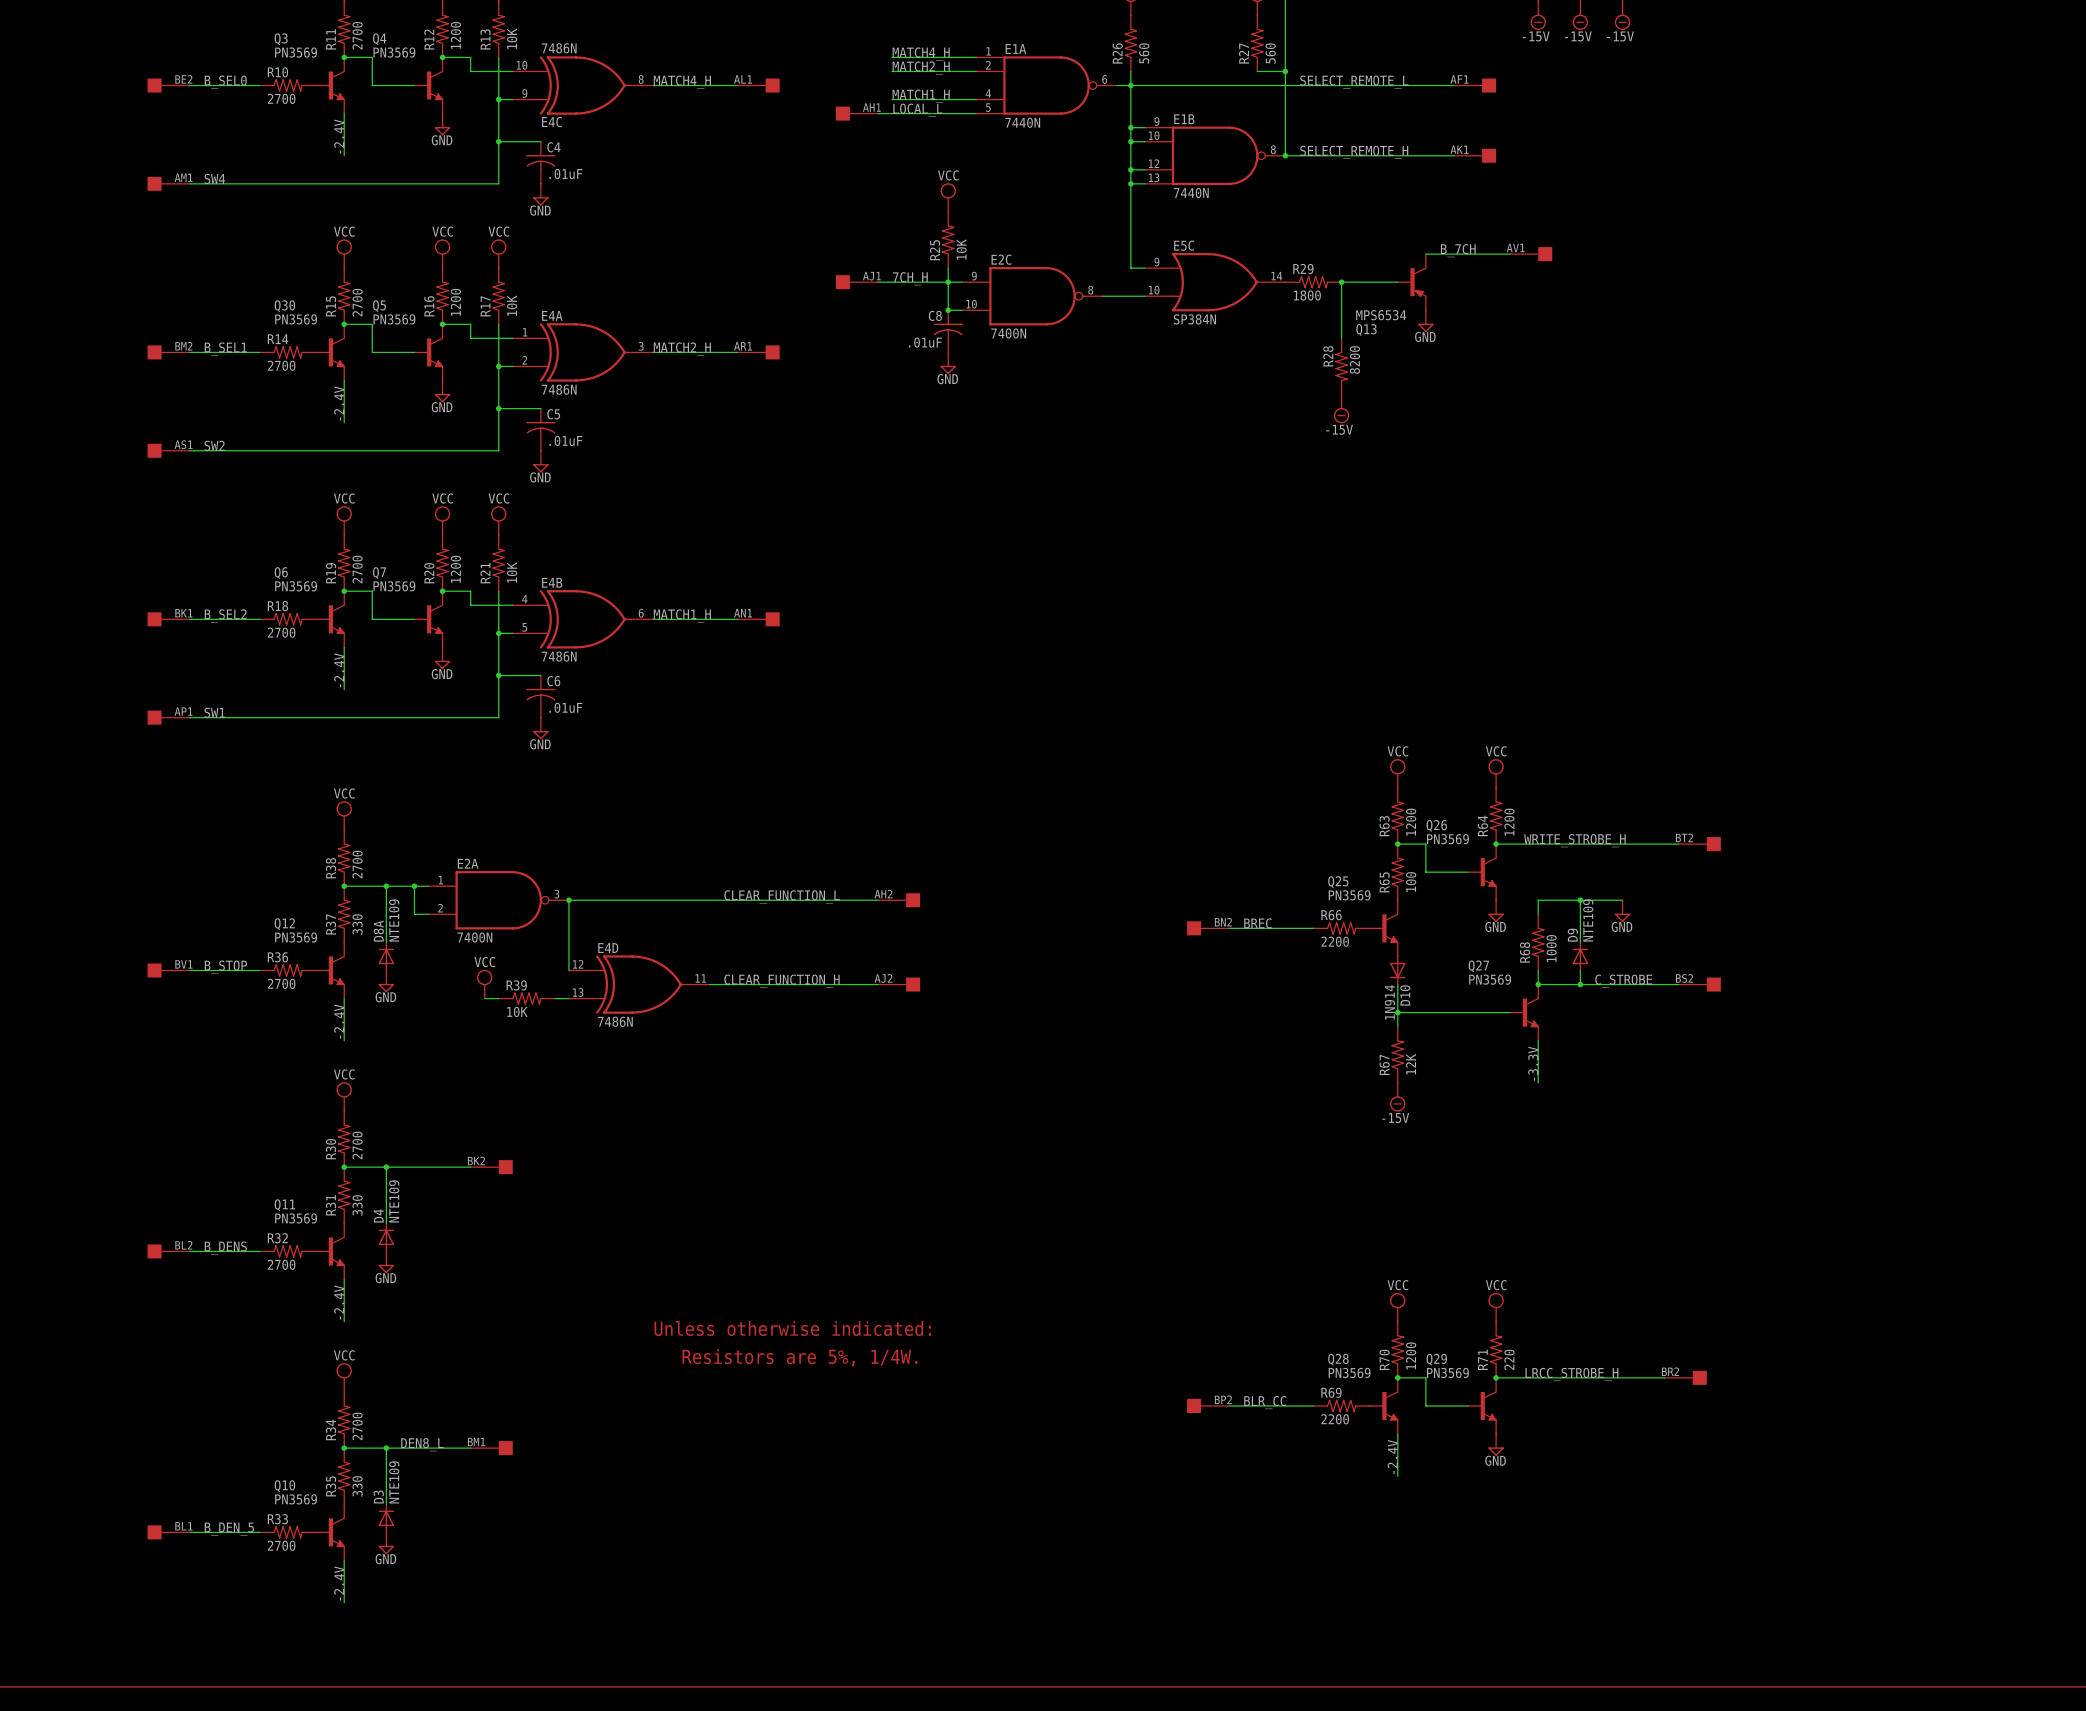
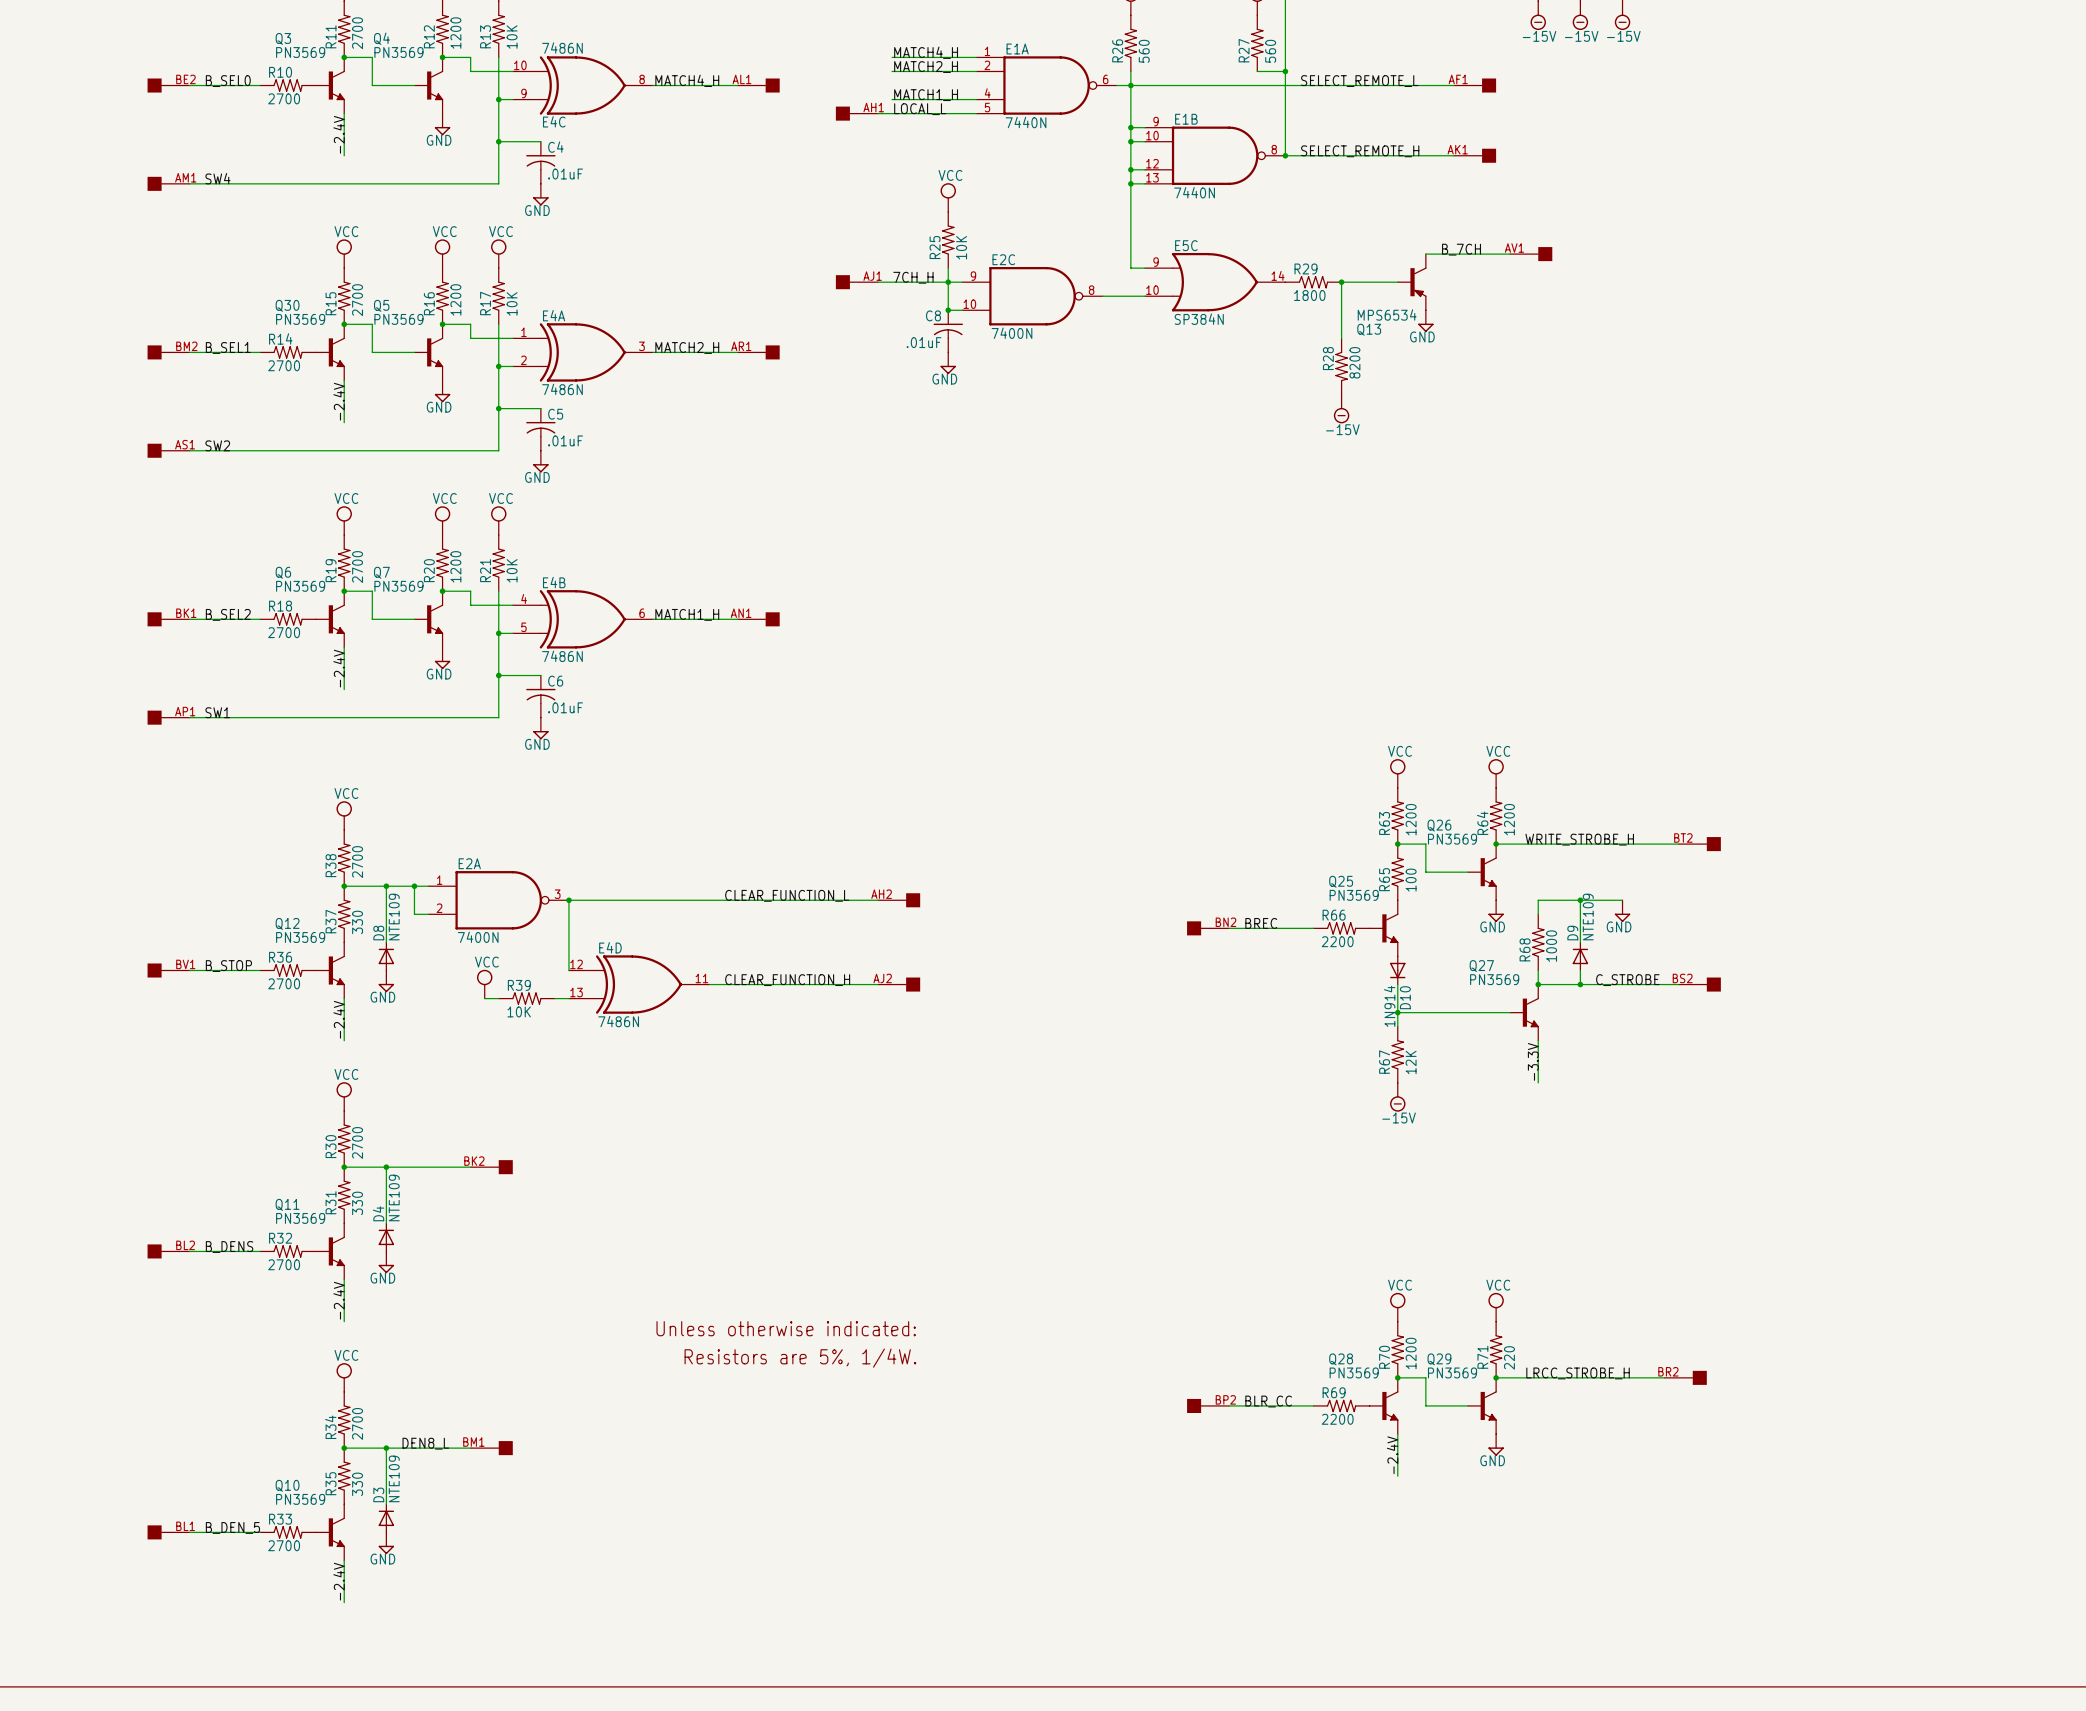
D8A name: D8A (378, 931) -> D8 (378, 933)

